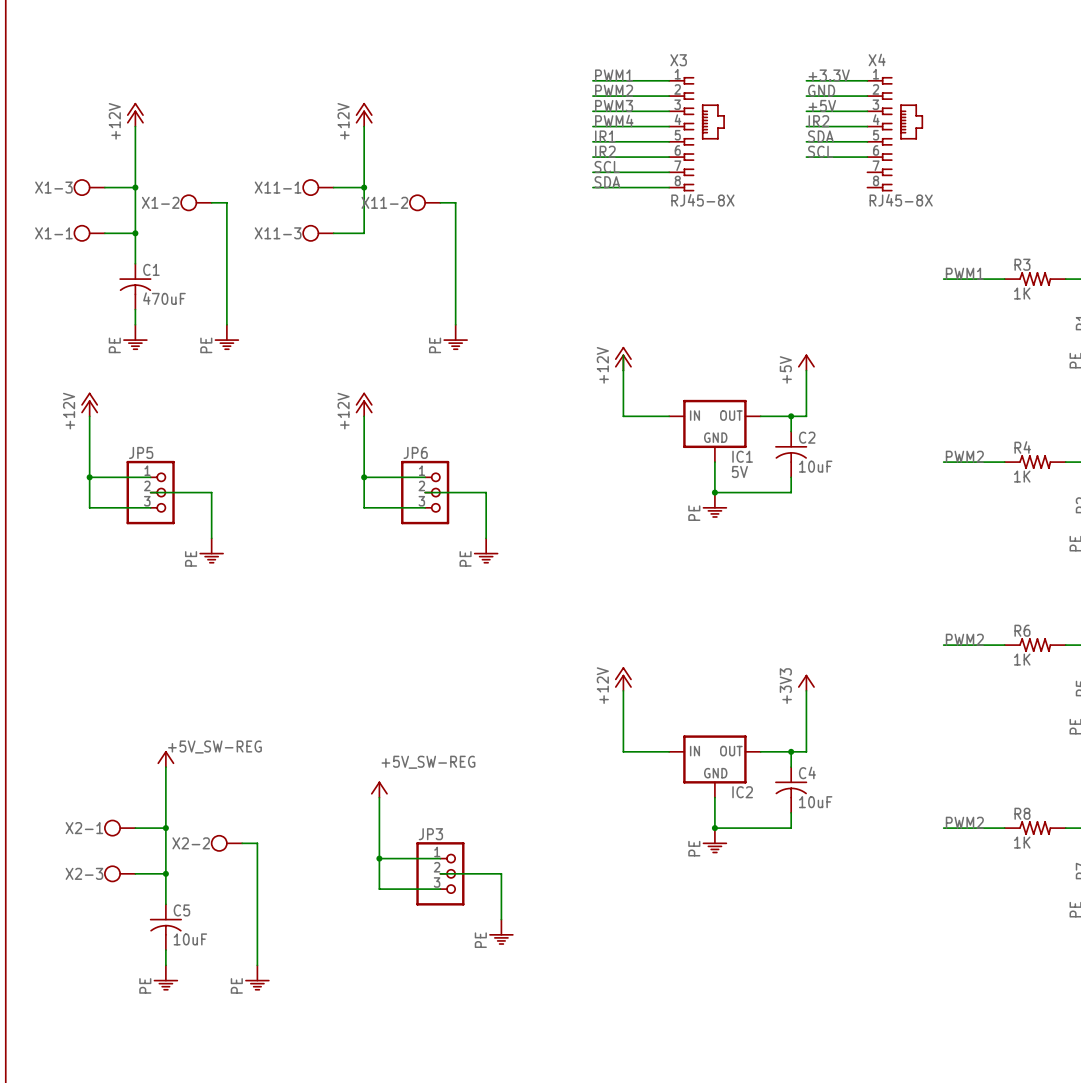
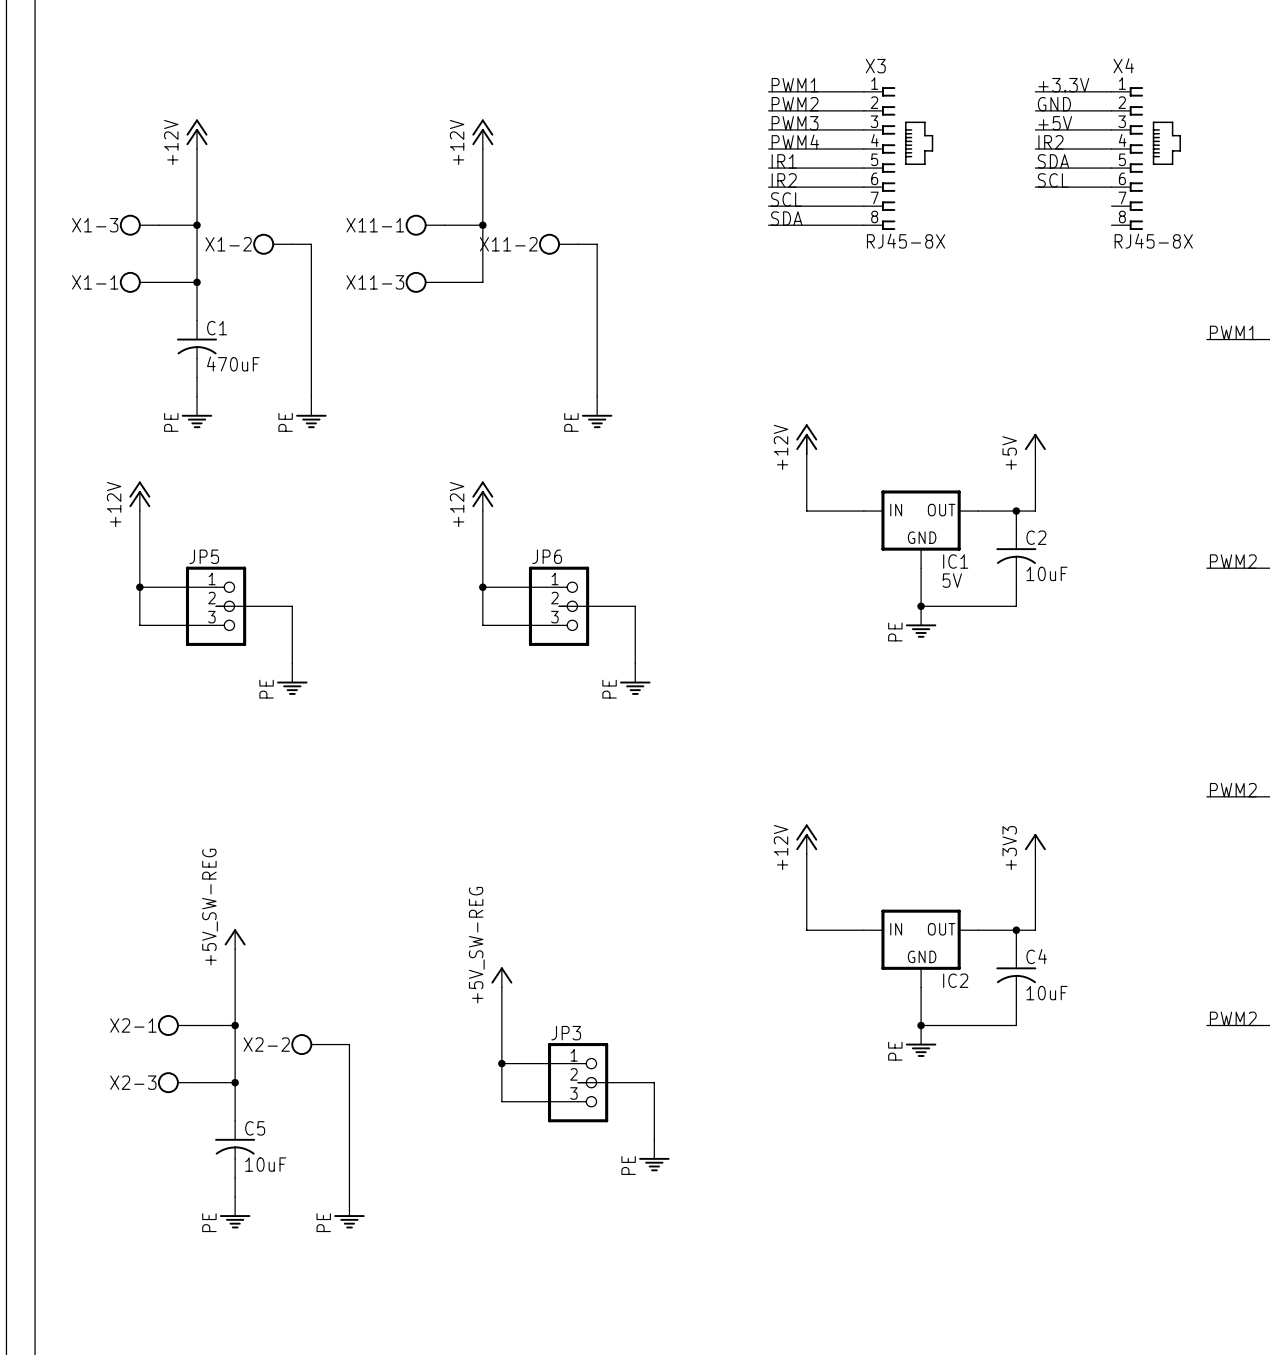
power symbol text rotation: 0° (214, 747) -> 90° counterclockwise (210, 907)
power symbol text rotation: 0° (428, 762) -> 90° counterclockwise (476, 945)

